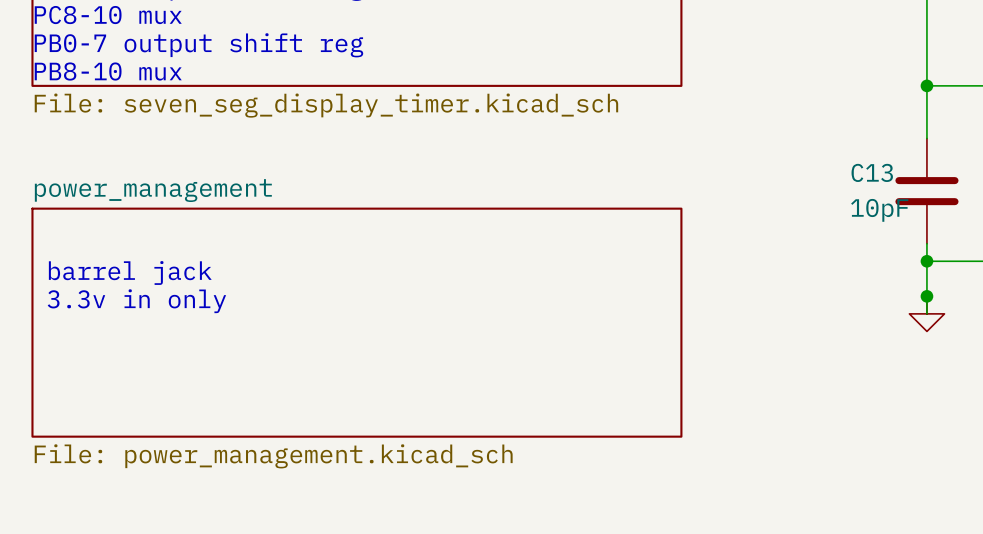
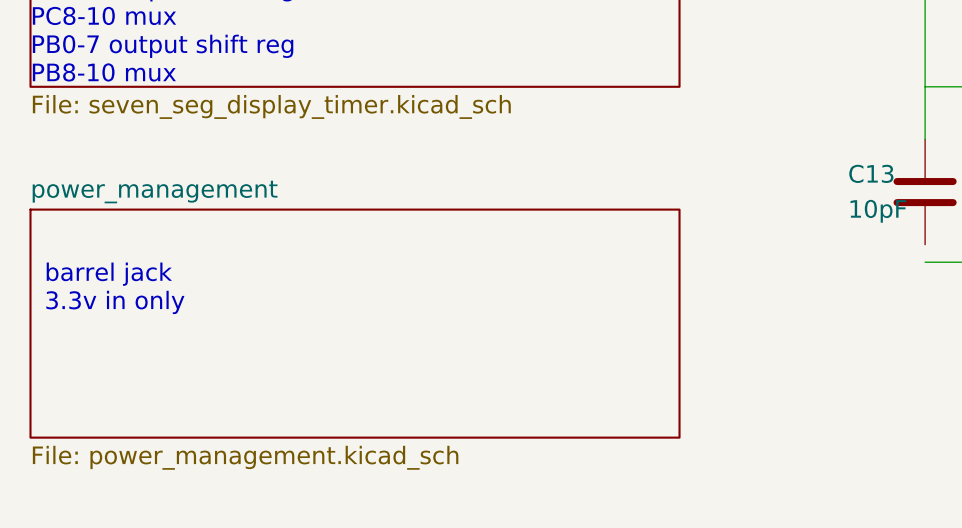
junction: (926, 85) -> none
wire: (926, 243) (926, 313) -> none
junction: (926, 261) -> none
junction: (926, 296) -> none
power symbol: (926, 313) -> none

